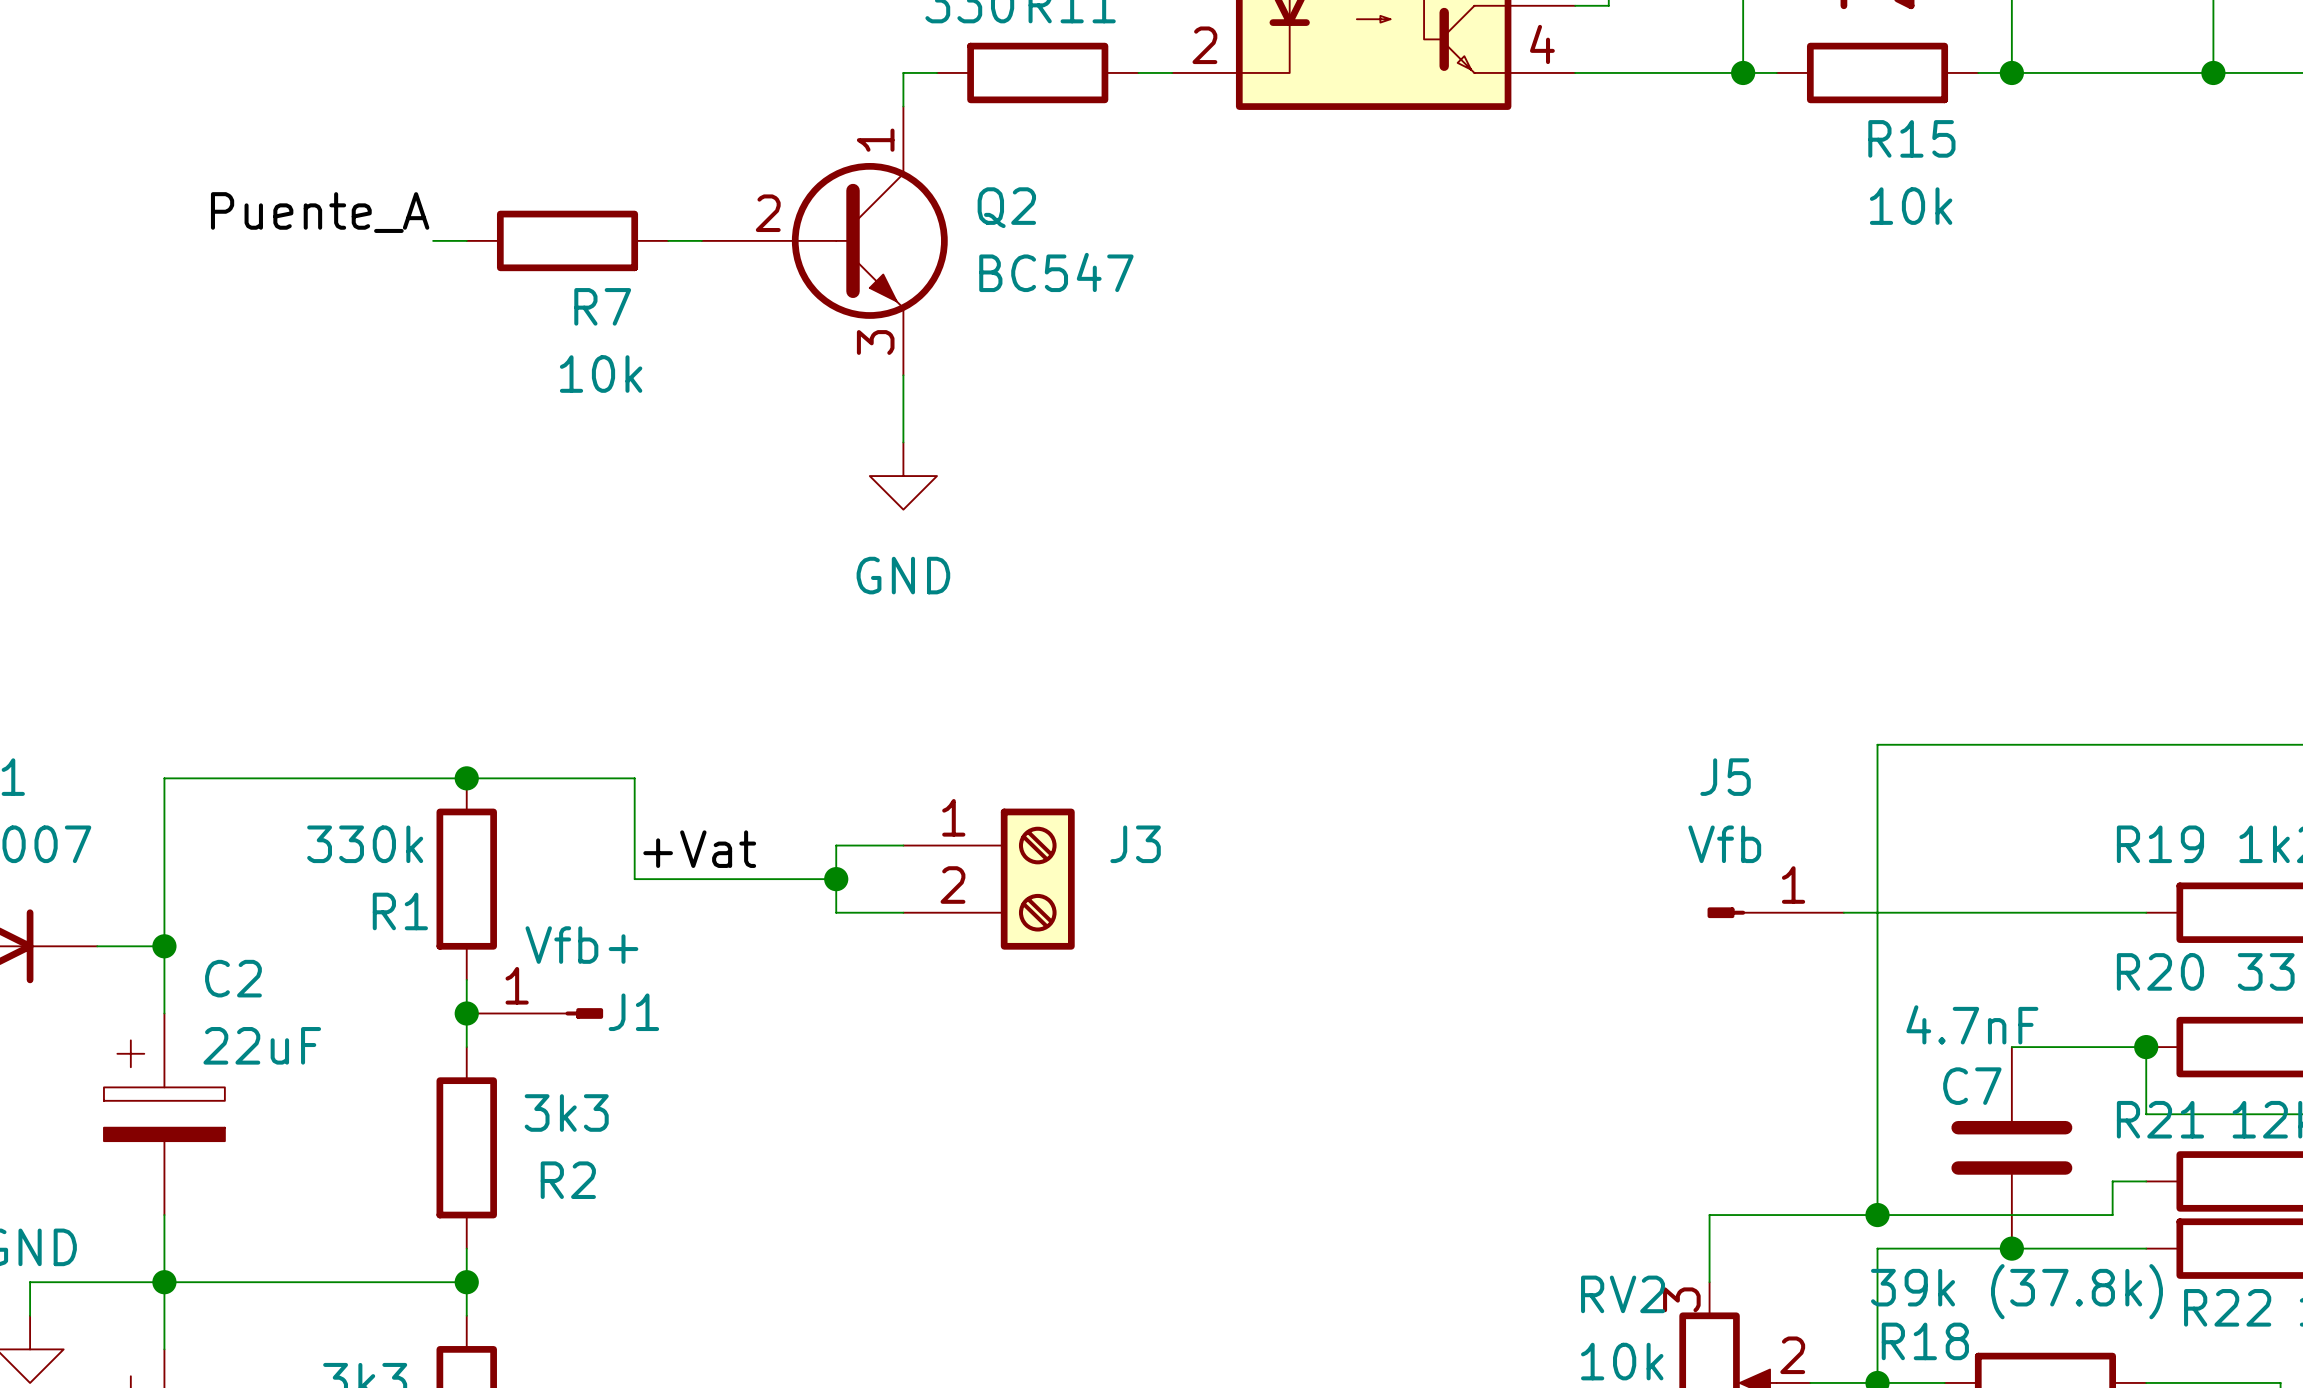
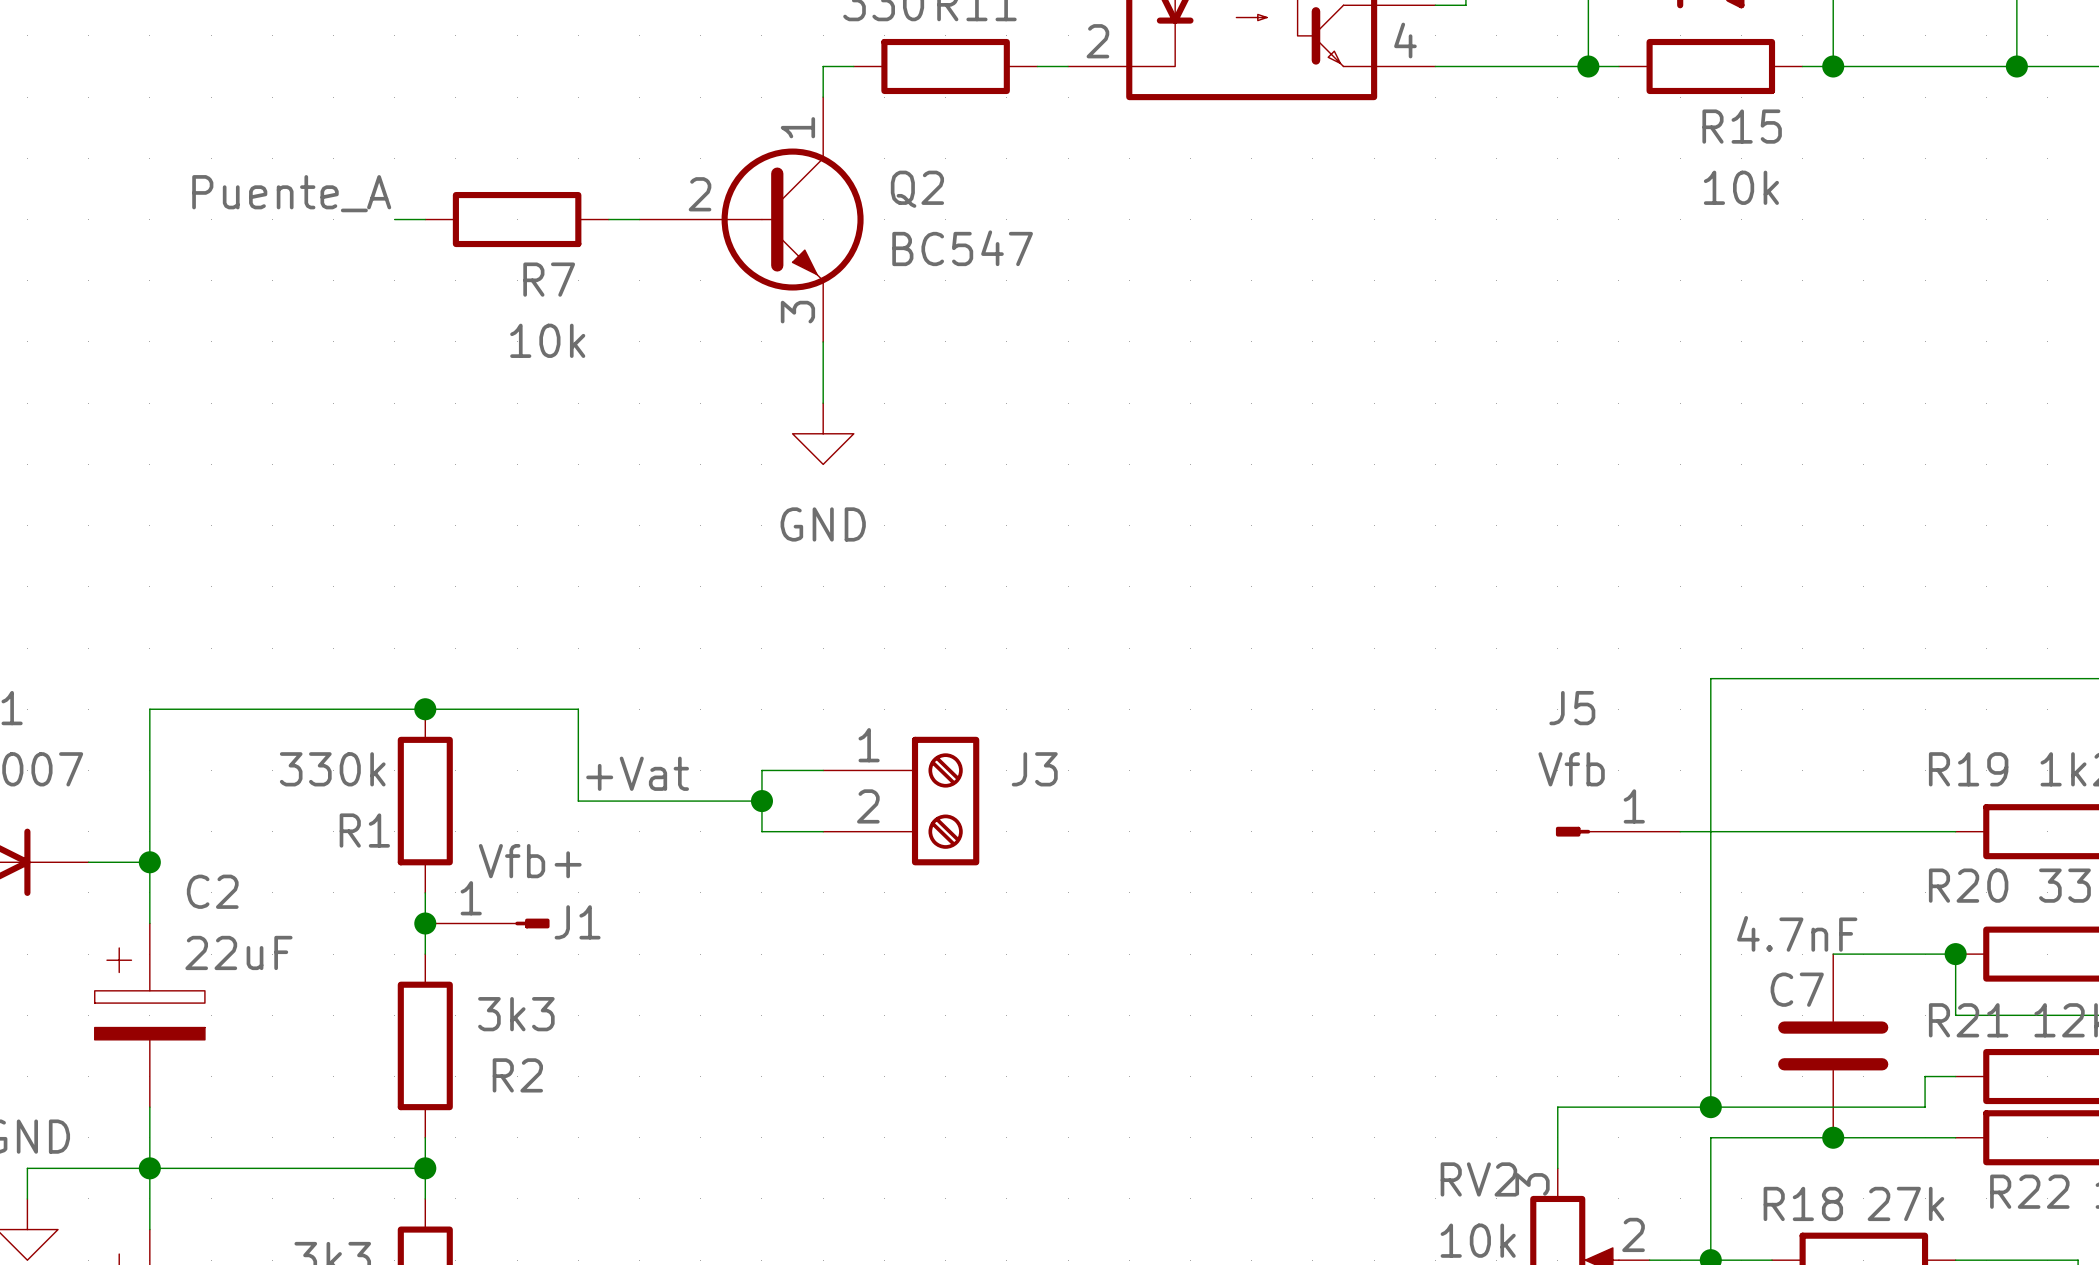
R18 value: 39k (37.8k) (2016, 1291) -> 27k (1905, 1203)
R18 name position: R18 (1925, 1341) -> R18 (1803, 1203)

